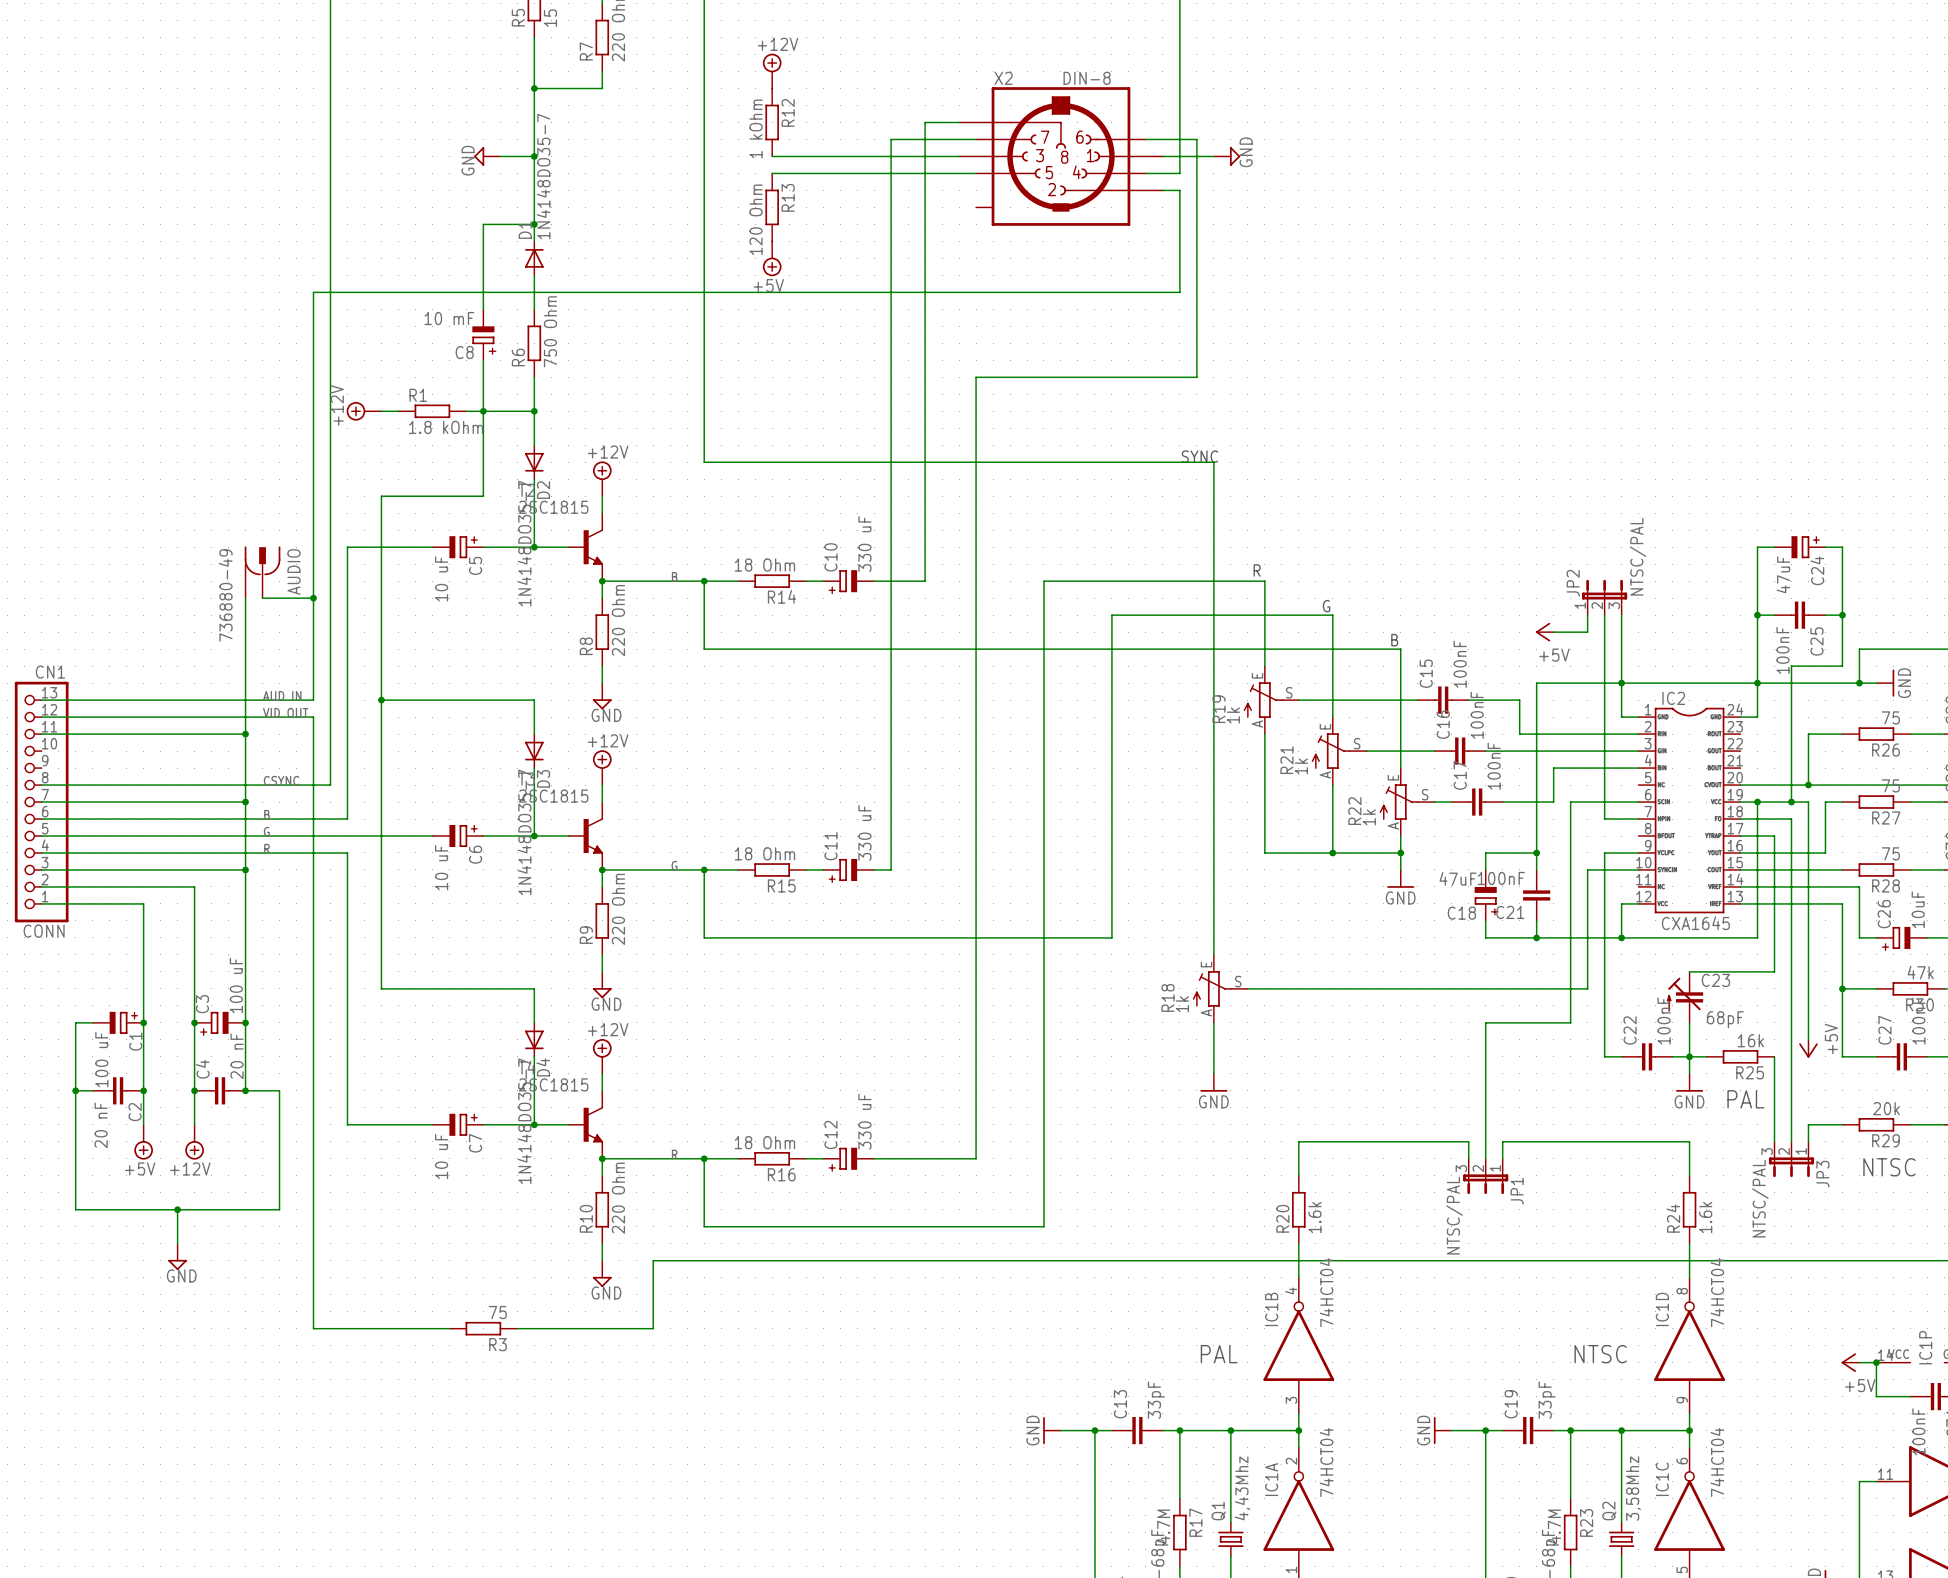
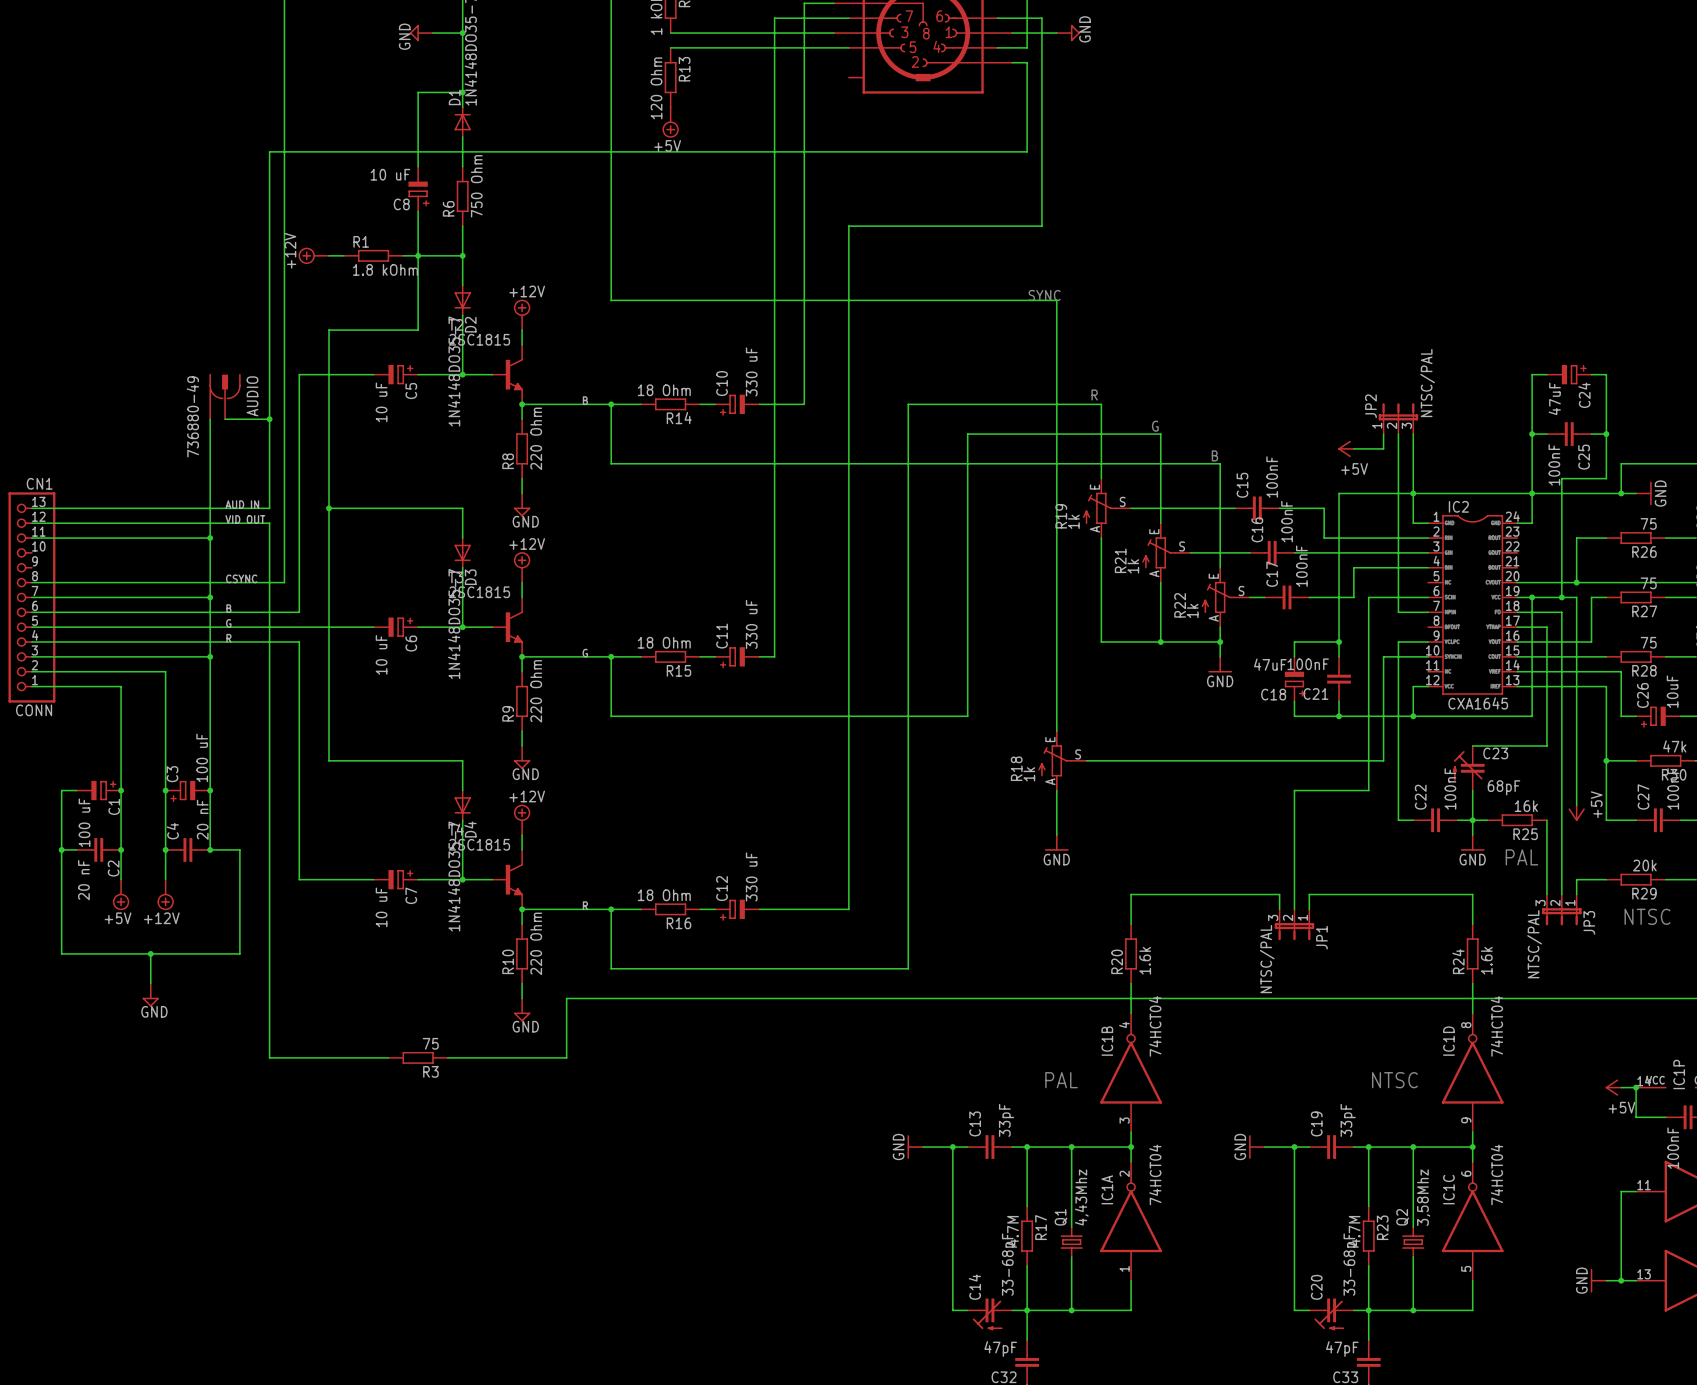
C8 value: 10 mF (449, 318) -> 10 uF (390, 174)

